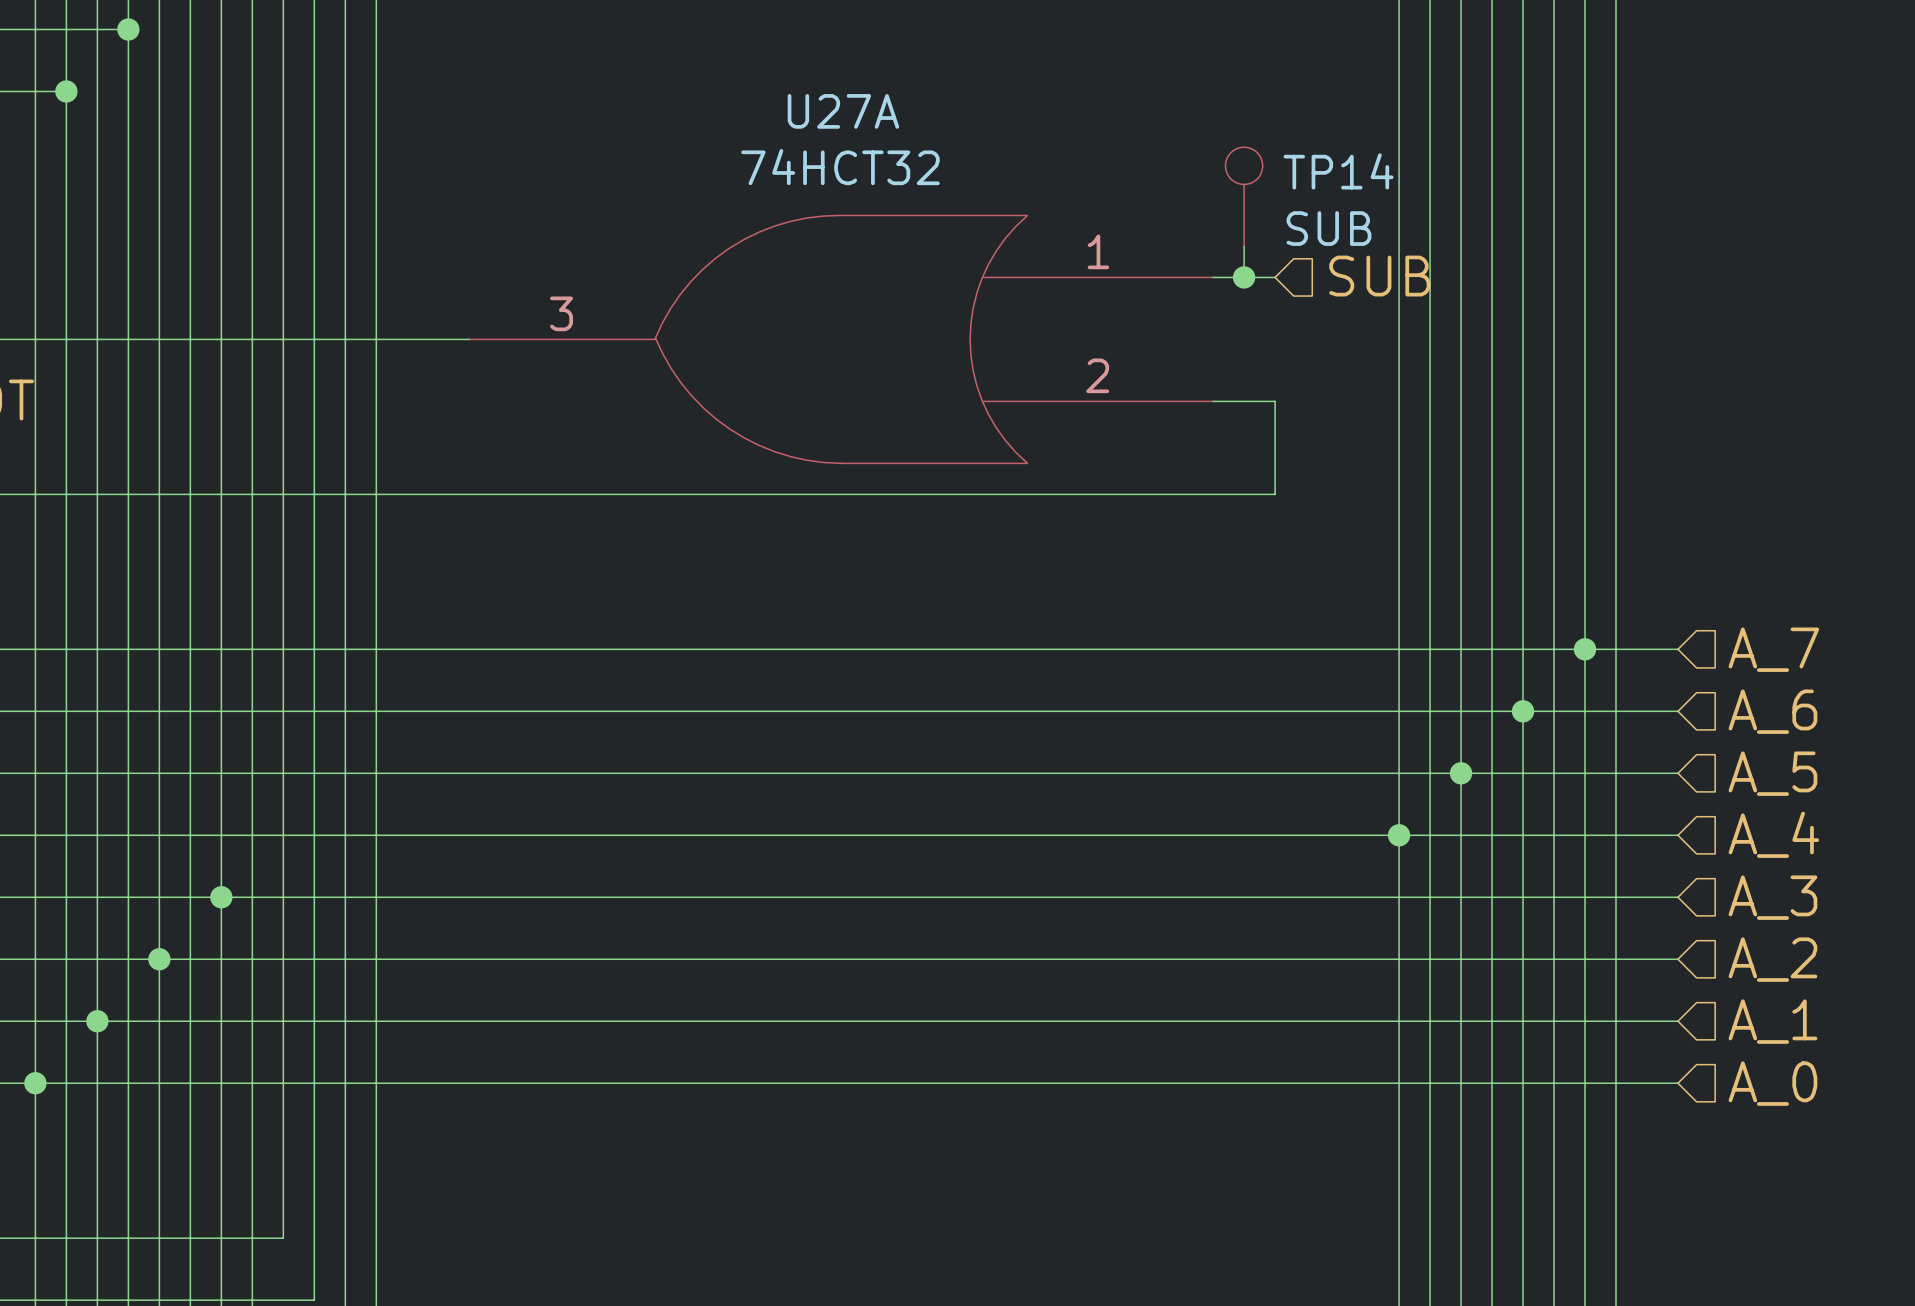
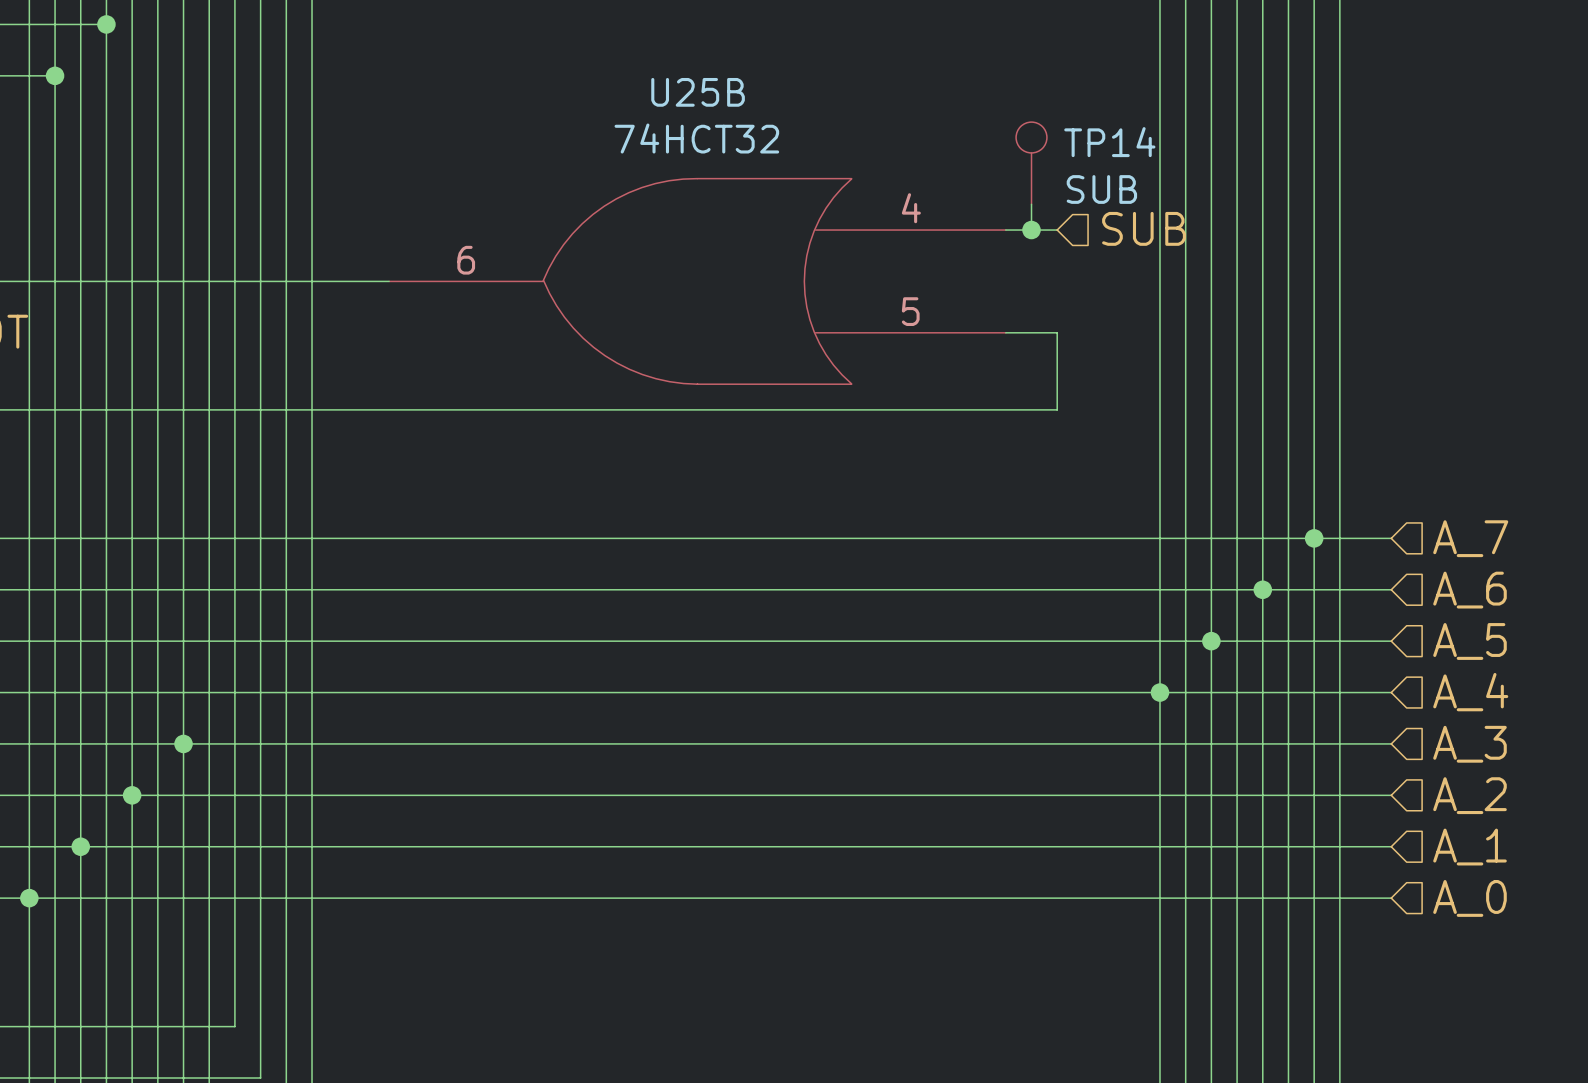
U27A name: U27A (843, 111) -> U25B (698, 92)
U27A pin number: 1 (1098, 251) -> 4 (911, 208)
U27A pin number: 3 (561, 313) -> 6 (466, 260)
U27A pin number: 2 (1097, 375) -> 5 (910, 311)

